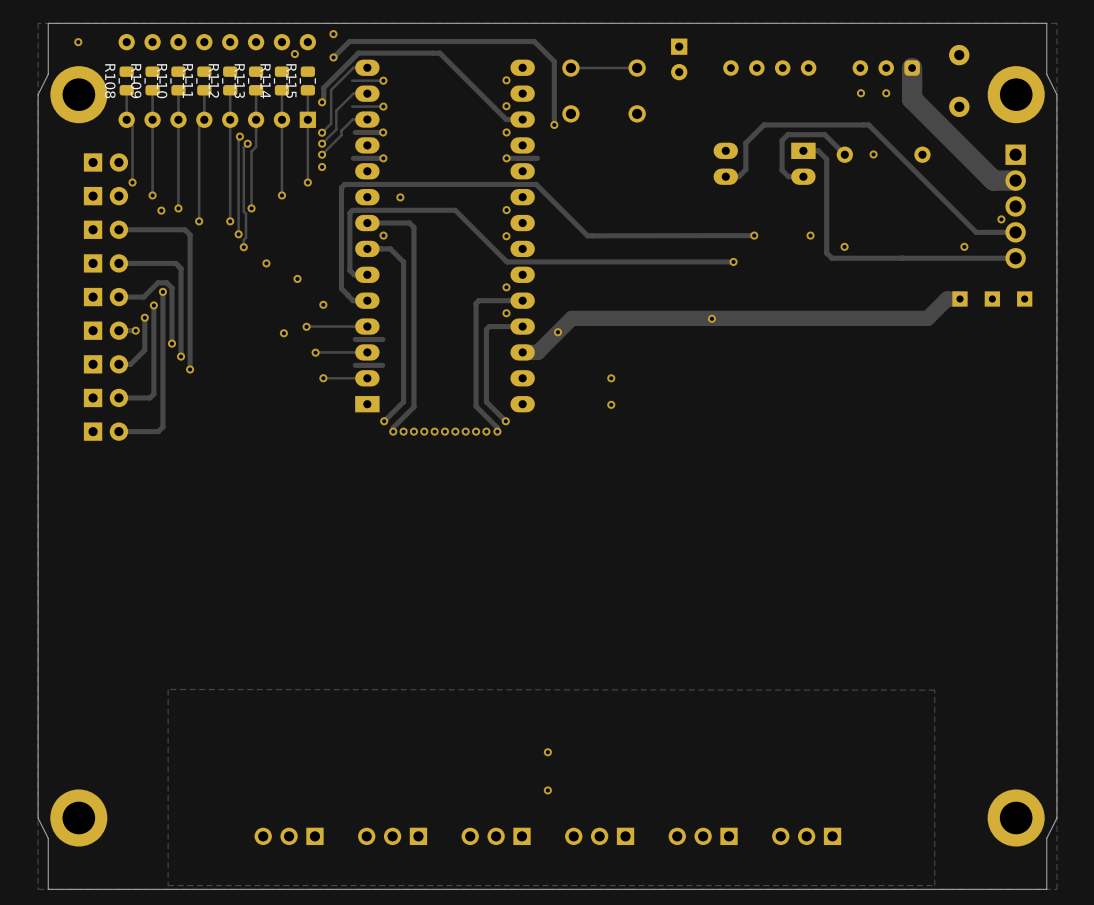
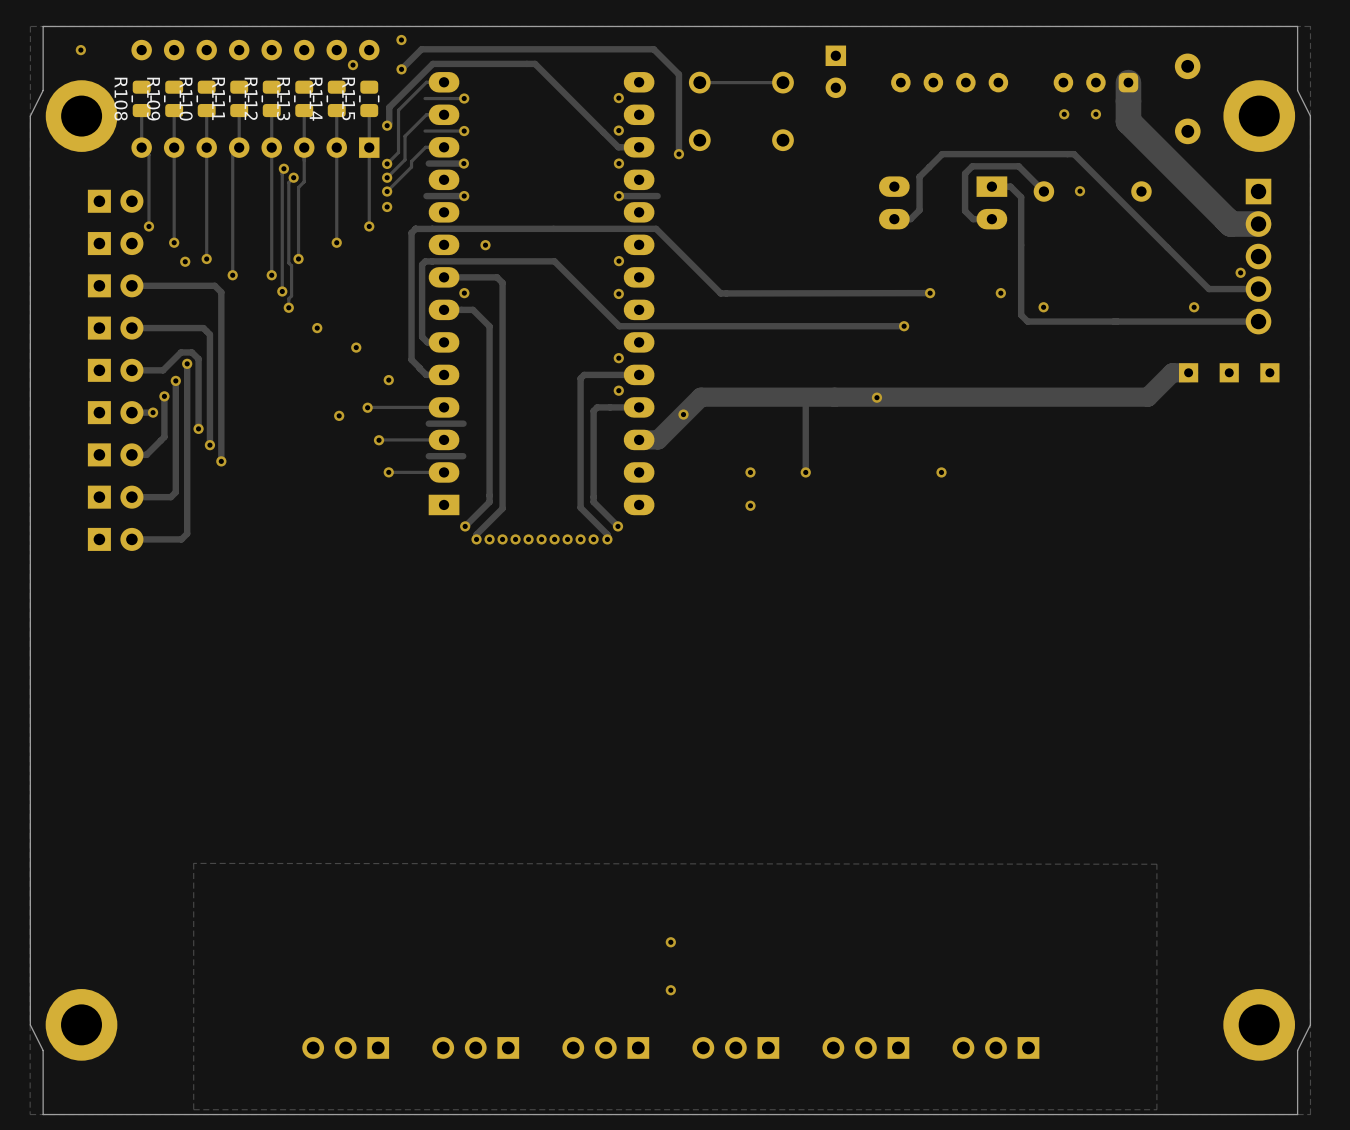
track: none -> (834, 397) (805, 396) (805, 472)
via: none -> (805, 472)
via: none -> (941, 472)

